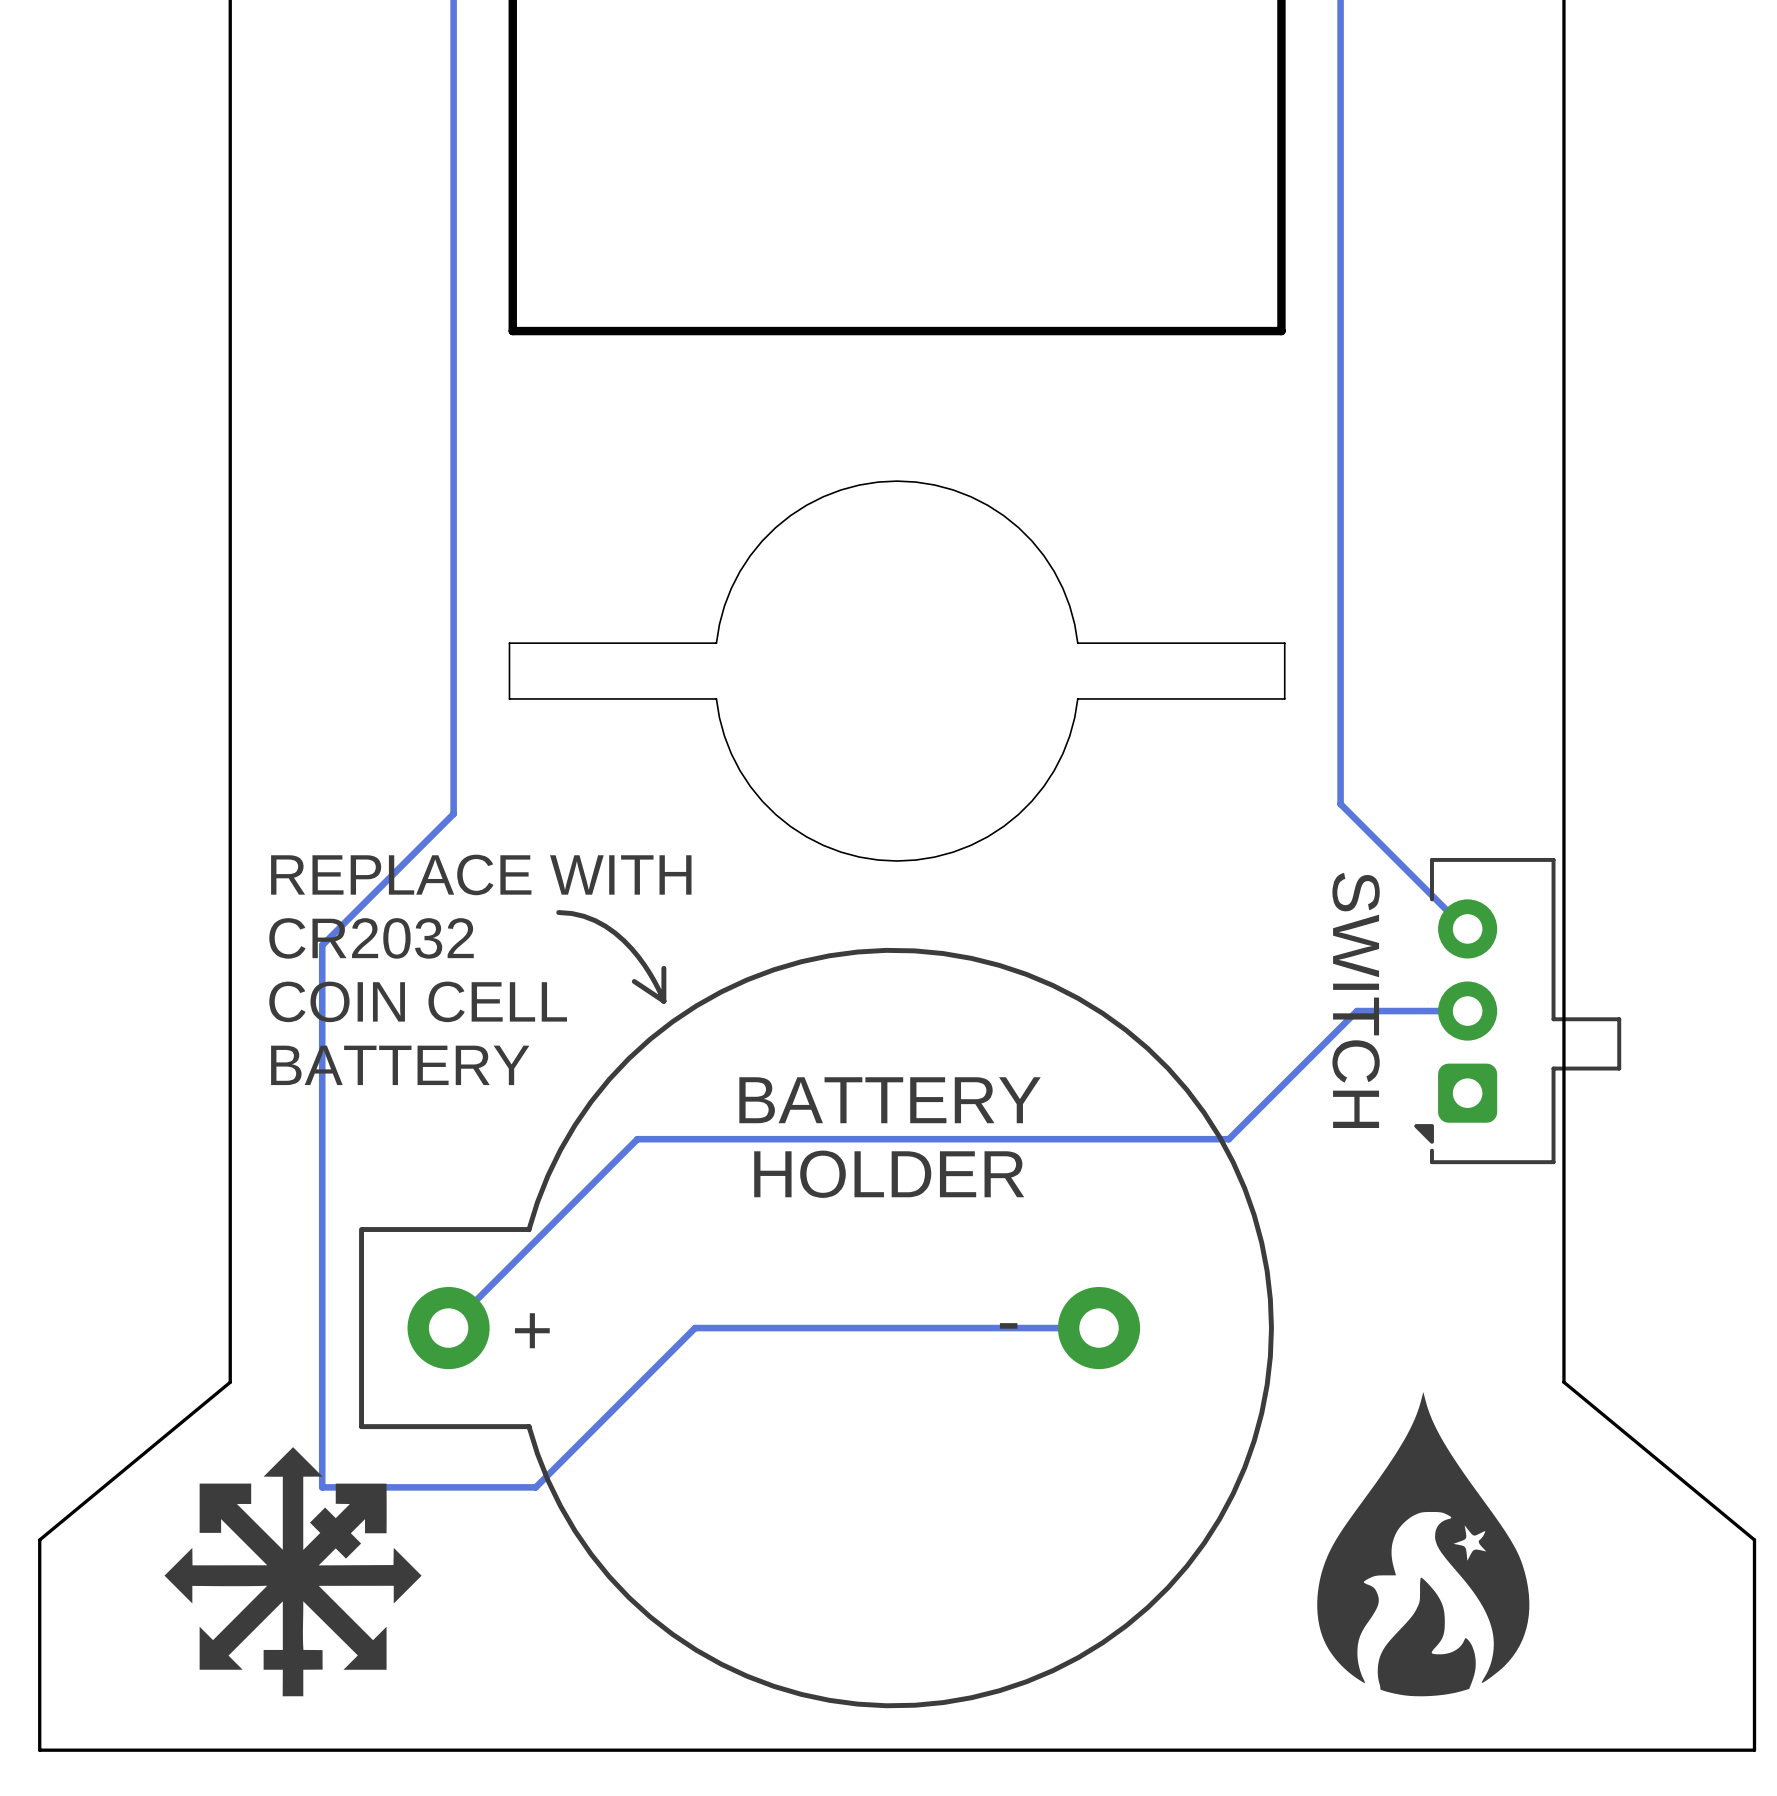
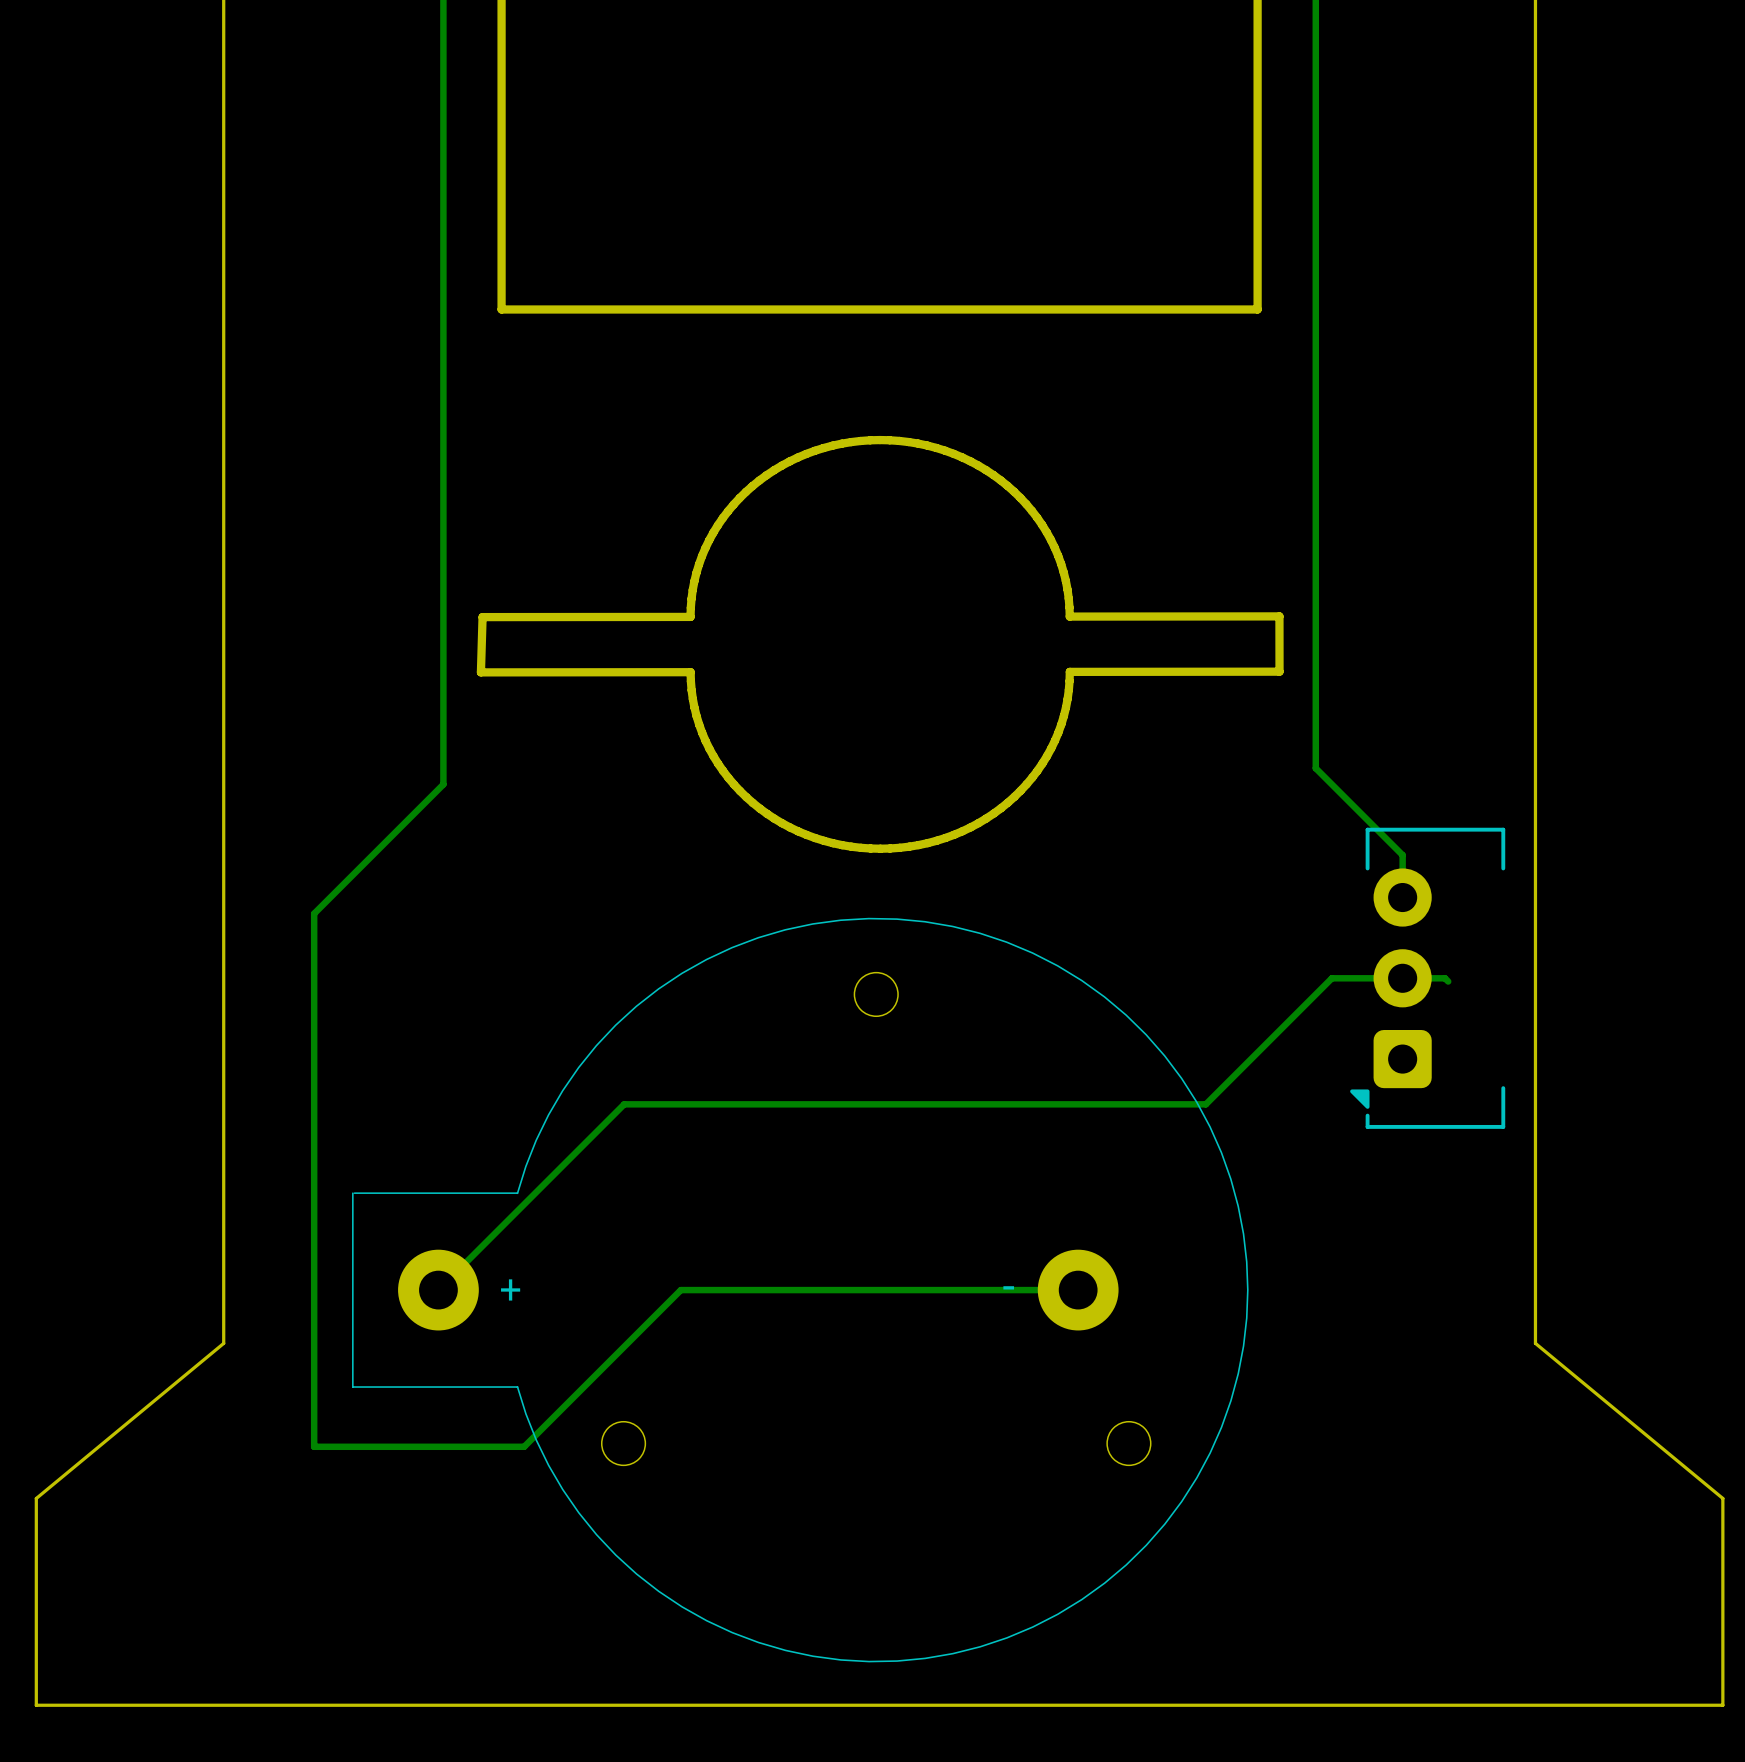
board edge: (1284, 643) (1284, 698) (1077, 698) (1069, 736) (1054, 770) (1043, 786) (1018, 814) (1003, 826) (970, 845) (934, 857) (916, 860) (878, 860) (841, 852) (823, 845) (790, 826) (762, 801) (739, 770) (724, 736) (716, 698) (509, 698) (509, 643) (716, 643) (719, 624) (731, 588) (750, 555) (762, 540) (790, 515) (823, 496) (841, 489) (878, 482) (916, 482) (953, 489) (987, 505) (1018, 527) (1043, 555) (1062, 588) (1074, 624) (1077, 643) (1284, 643) -> (879, 440) (918, 443) (953, 453) (986, 470) (1014, 491) (1037, 517) (1054, 547) (1065, 580) (1069, 616) (1279, 616) (1279, 671) (1069, 671) (1066, 707) (1054, 740) (1037, 770) (1014, 796) (986, 818) (954, 834) (918, 845) (880, 848) (842, 845) (806, 834) (774, 818) (746, 797) (723, 770) (705, 740) (694, 707) (690, 672) (480, 672) (482, 617) (690, 616) (694, 581) (705, 548) (722, 518) (745, 491) (774, 470) (806, 454) (841, 443) (879, 440)
track: (1340, 797) (1340, 804) (1448, 912) (1448, 928) -> (1315, 768) (1402, 855) (1402, 897)
text: REPLACE WITH (481, 874) -> none
line: (558, 912) (584, 916) (615, 933) (631, 948) (644, 965) (663, 1001) -> none
text: CR2032 (371, 938) -> none
part footprint: [359, 947, 1274, 1709] -> [352, 917, 1249, 1663]
line: (663, 968) (663, 1001) -> none
line: (634, 981) (663, 1001) -> none
text: SWITCH (1356, 1000) -> none
text: COIN CELL (418, 1001) -> none
part: none -> (1427, 978)
part: (1517, 1011) -> none
text: BATTERY (400, 1065) -> none
text: BATTERY (890, 1100) -> none
text: HOLDER (889, 1174) -> none
drawing: [1317, 1391, 1530, 1697] -> none
drawing: [164, 1447, 422, 1697] -> none

